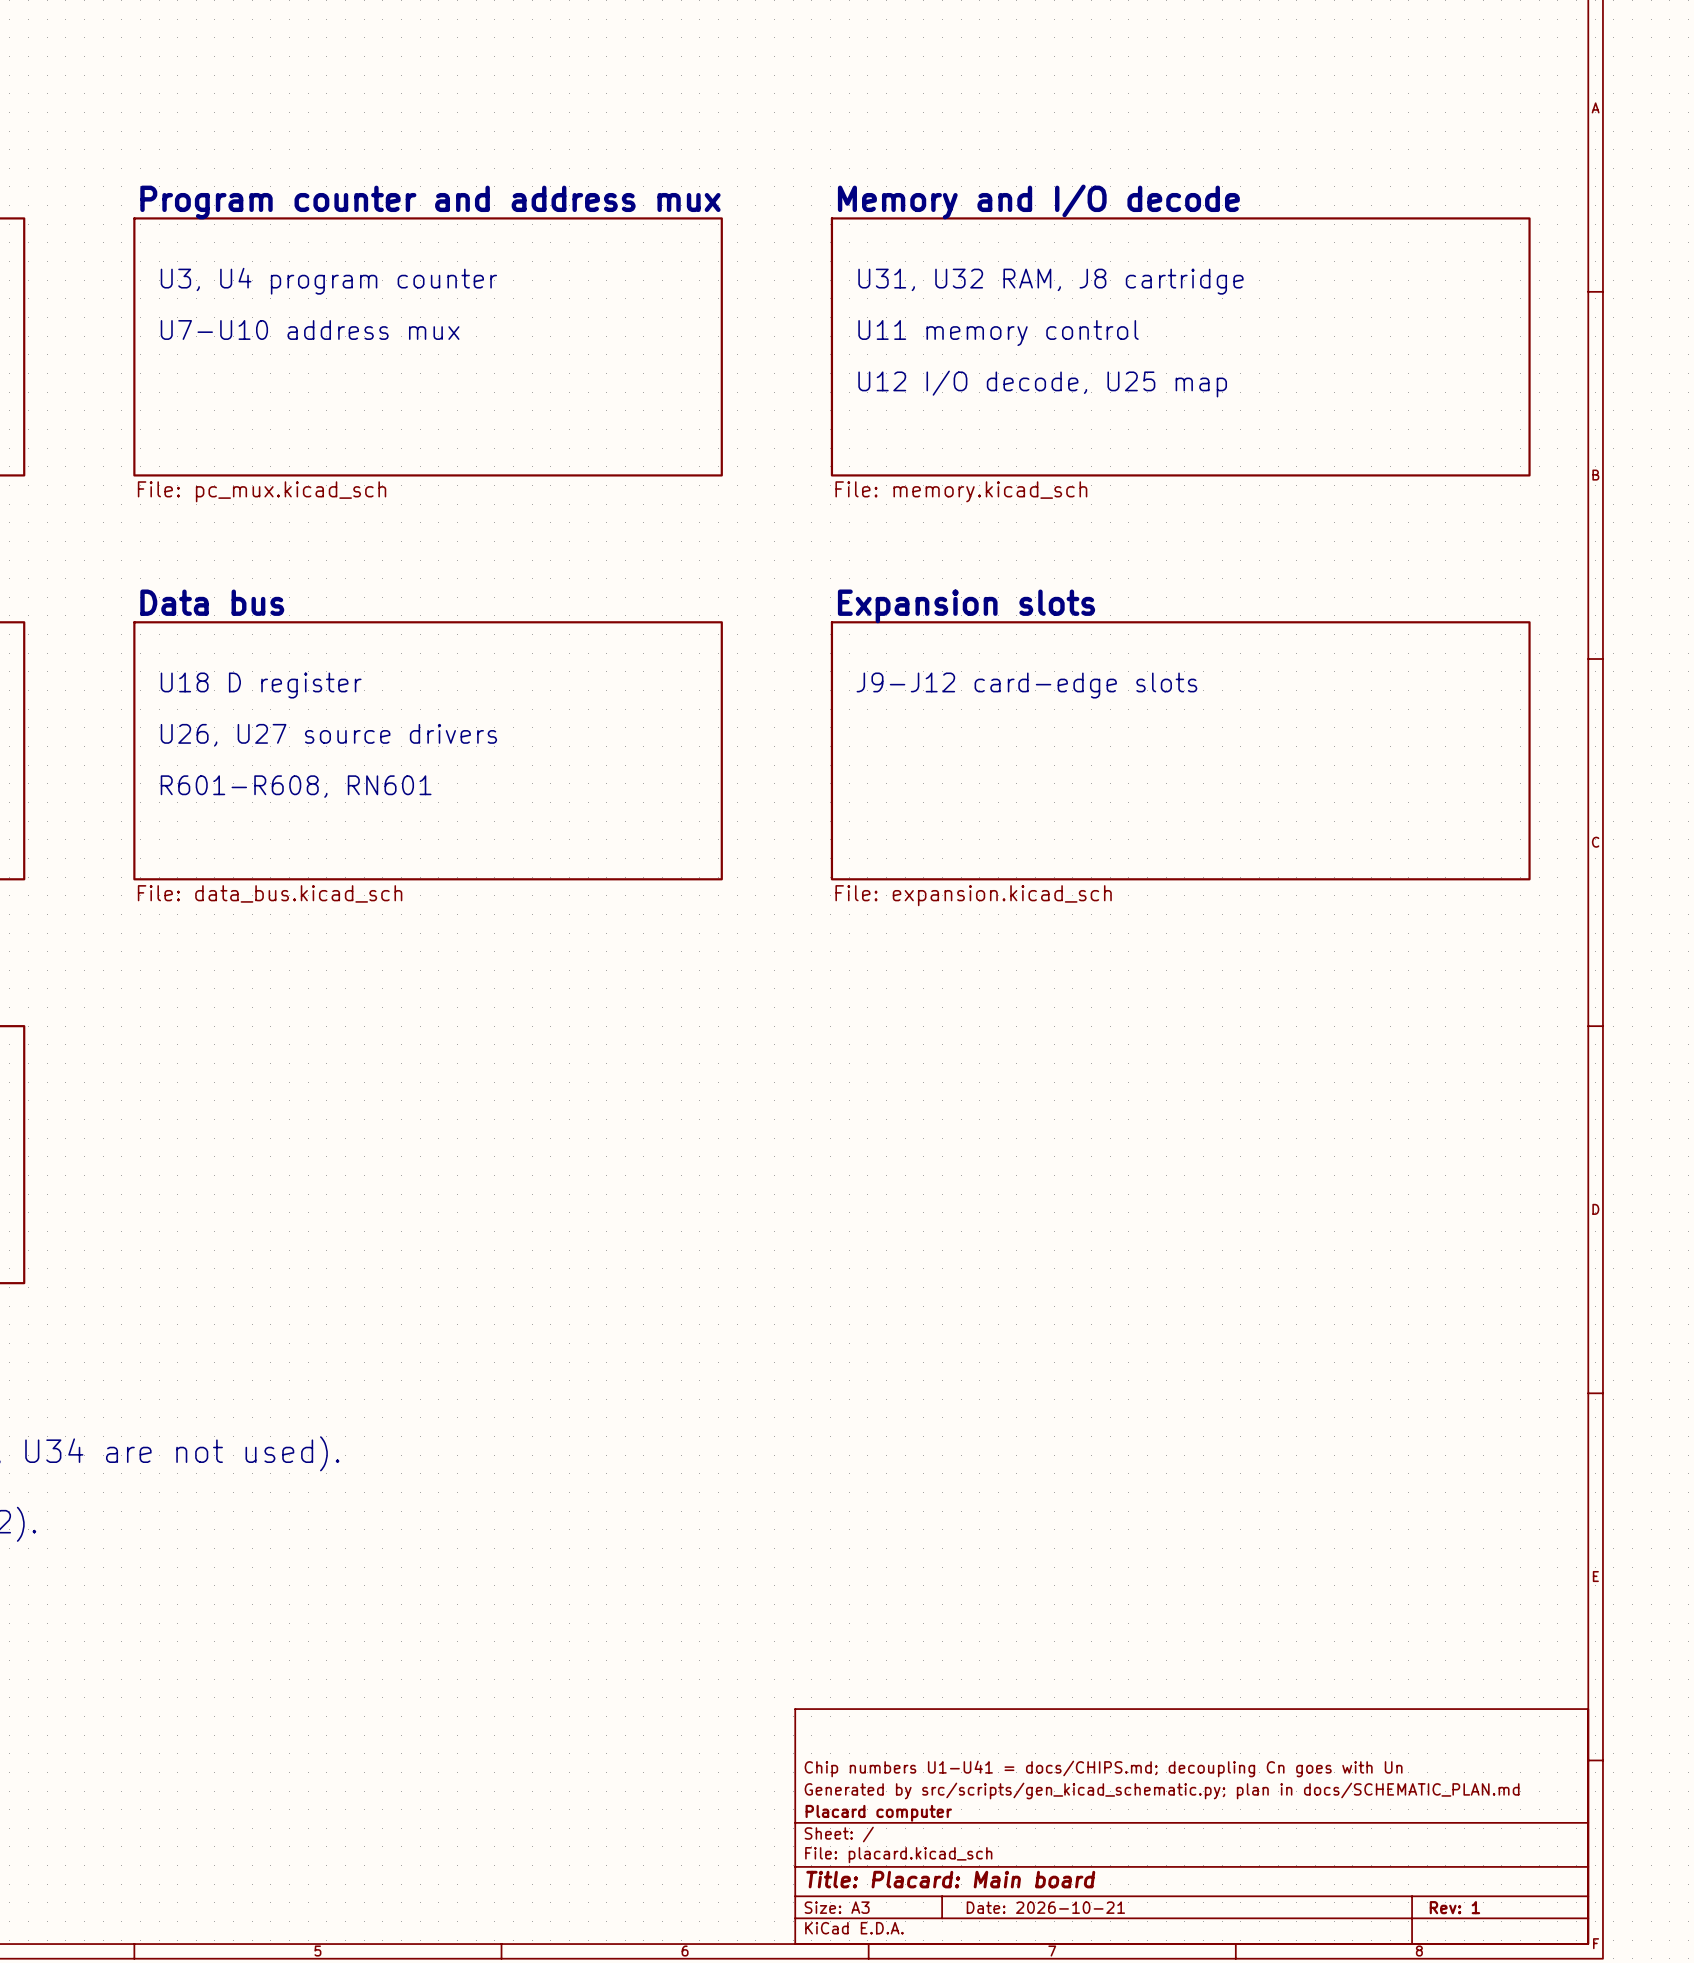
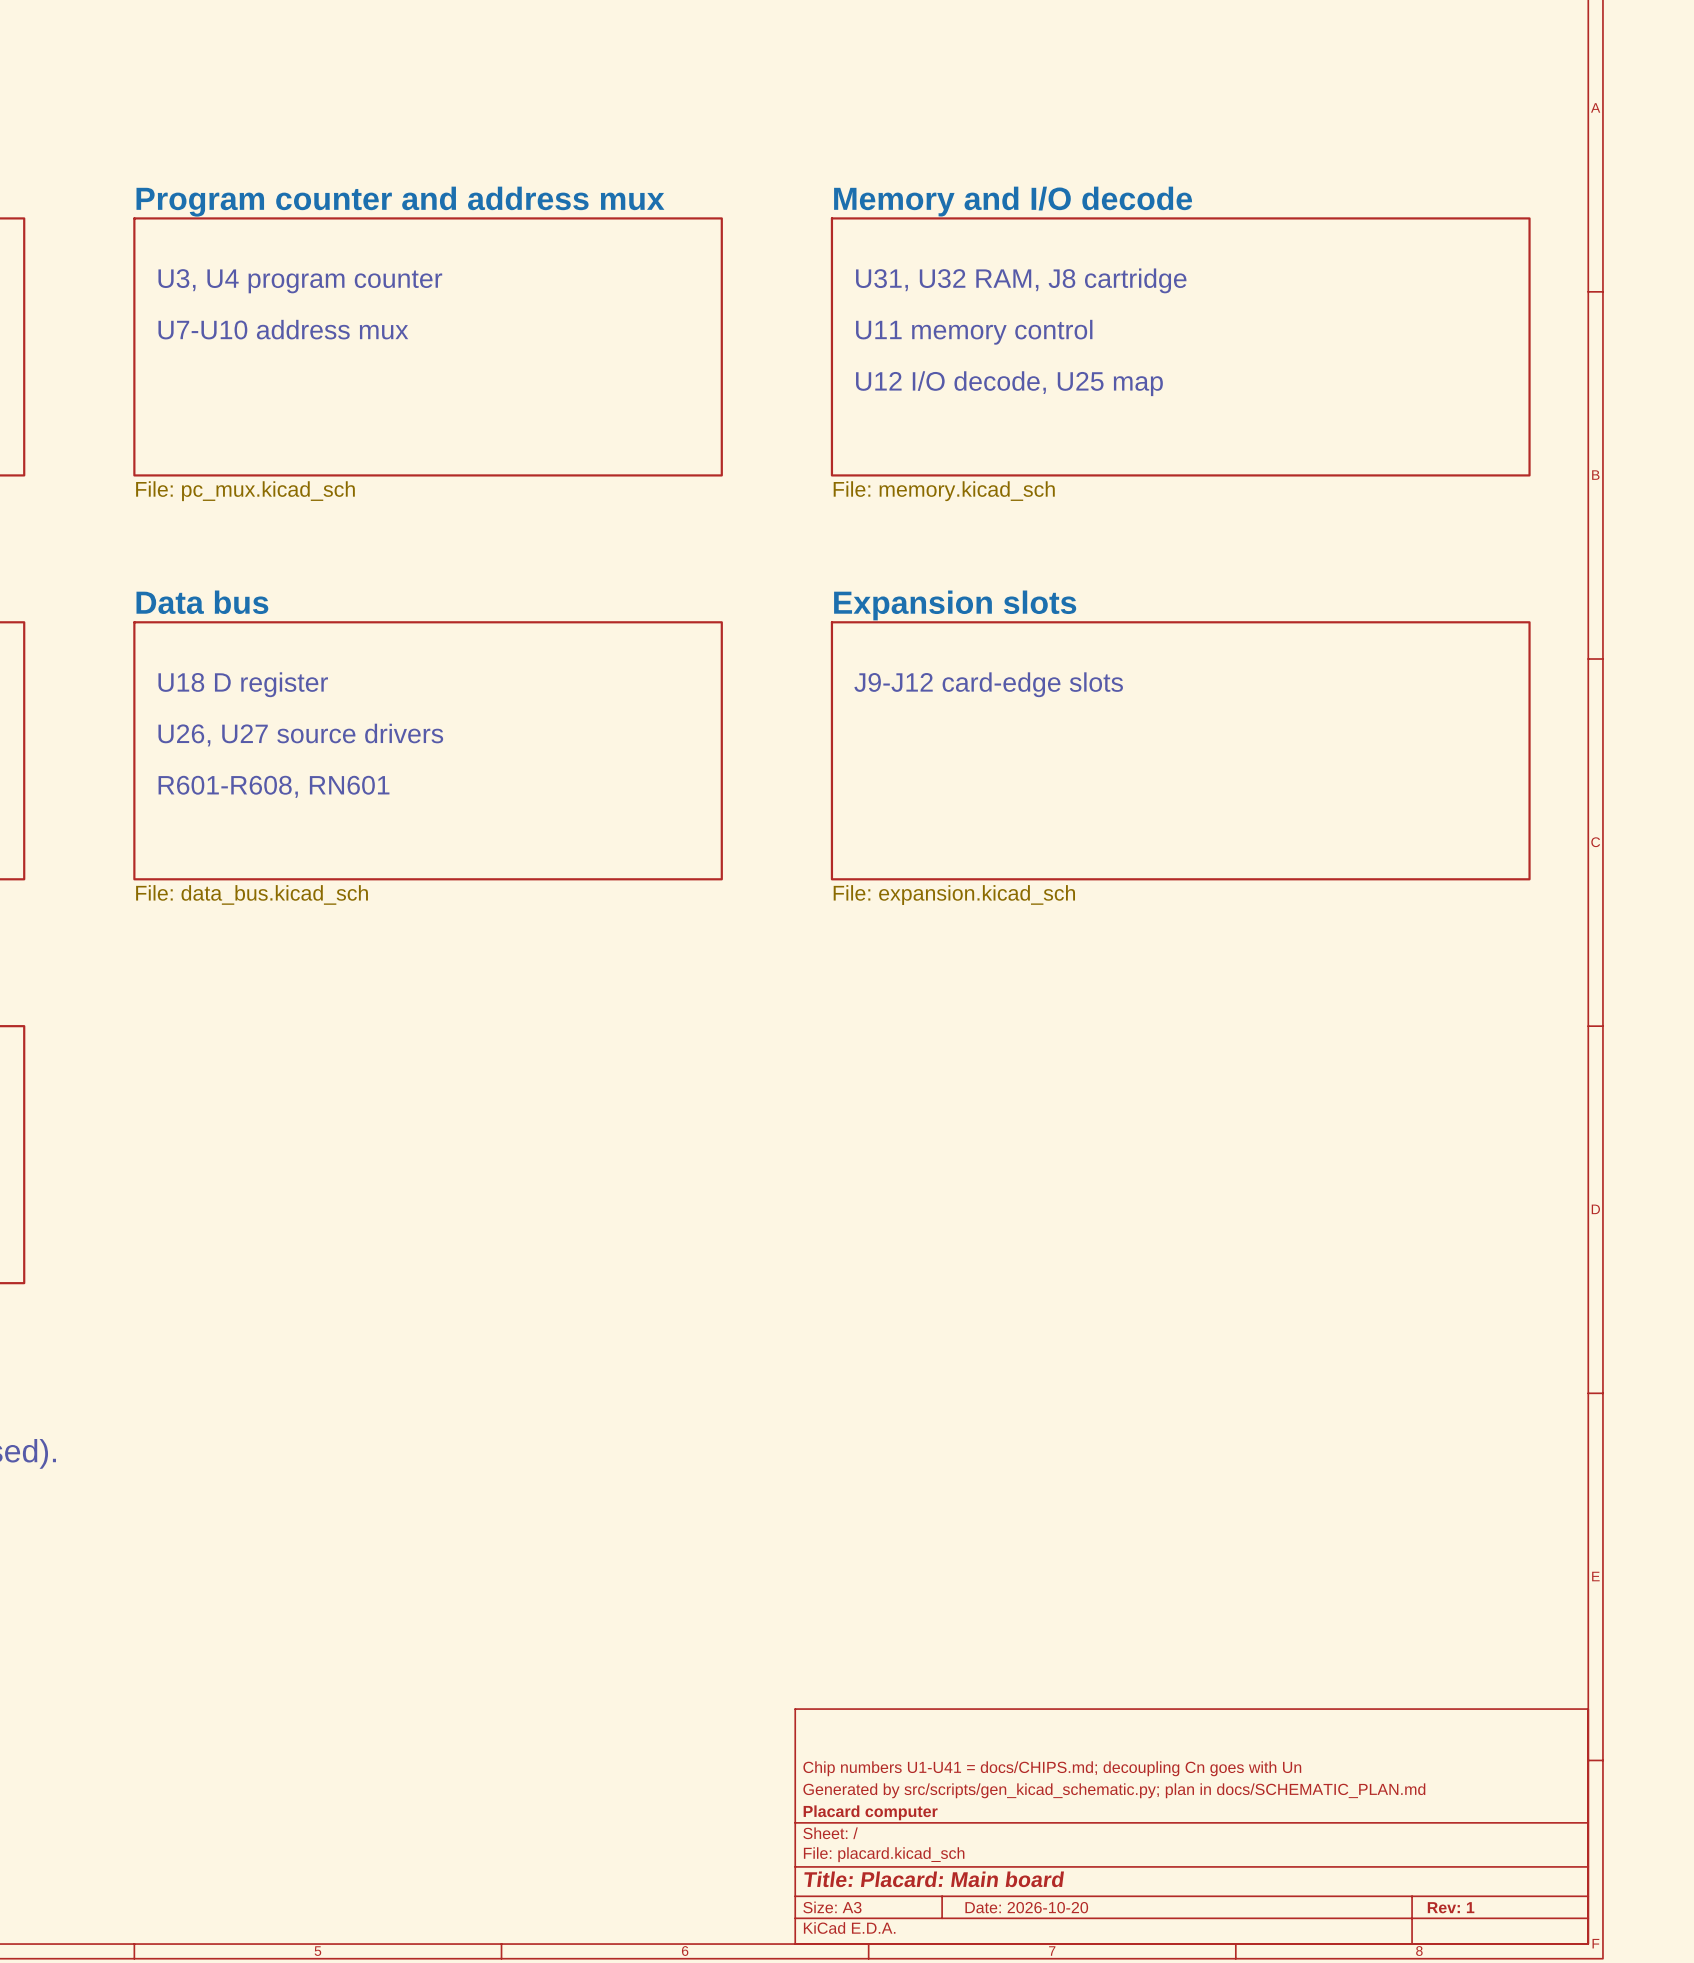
title block: Date: 2026-10-21 (1045, 1907) -> Date: 2026-10-20 (1026, 1907)

